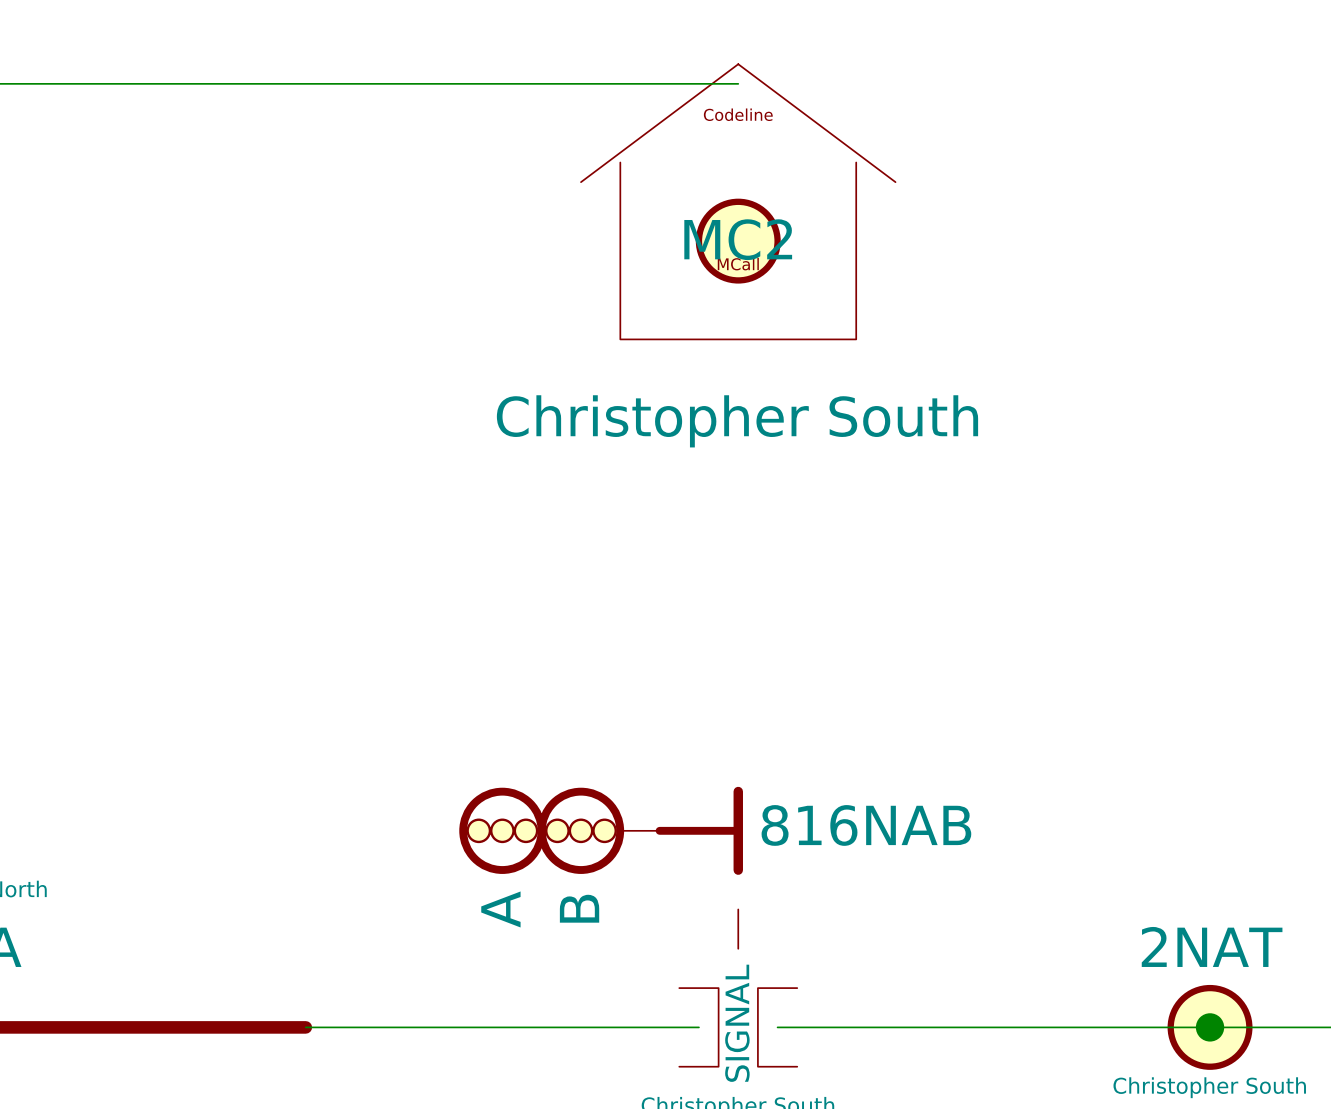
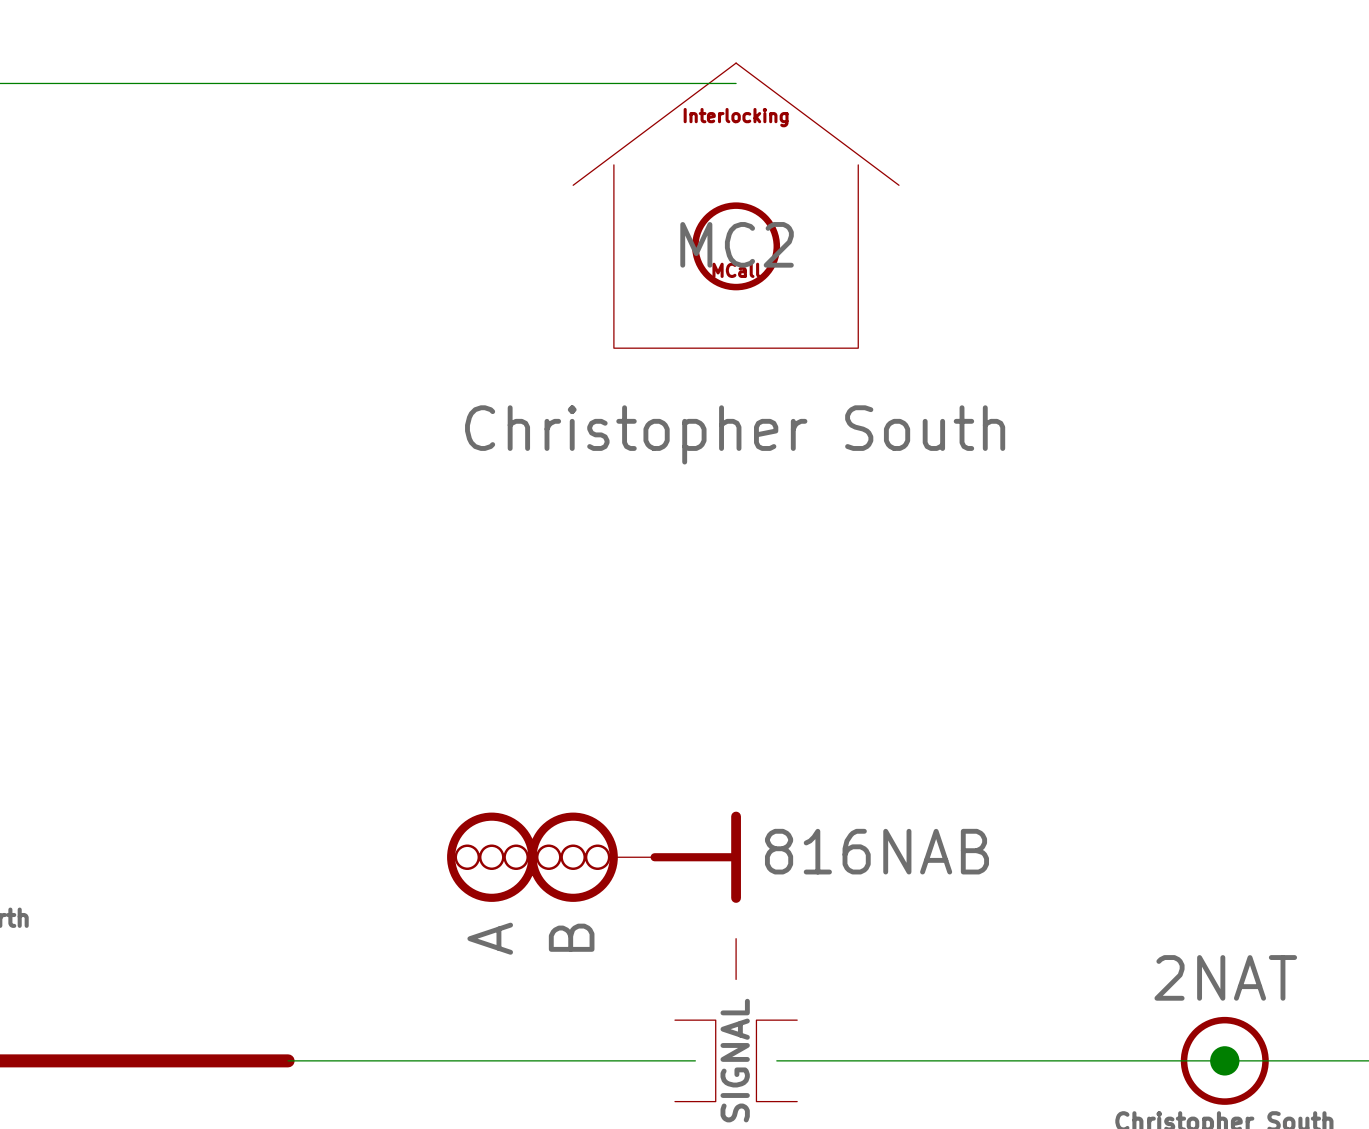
part text: Codeline (738, 114) -> Interlocking (736, 117)

